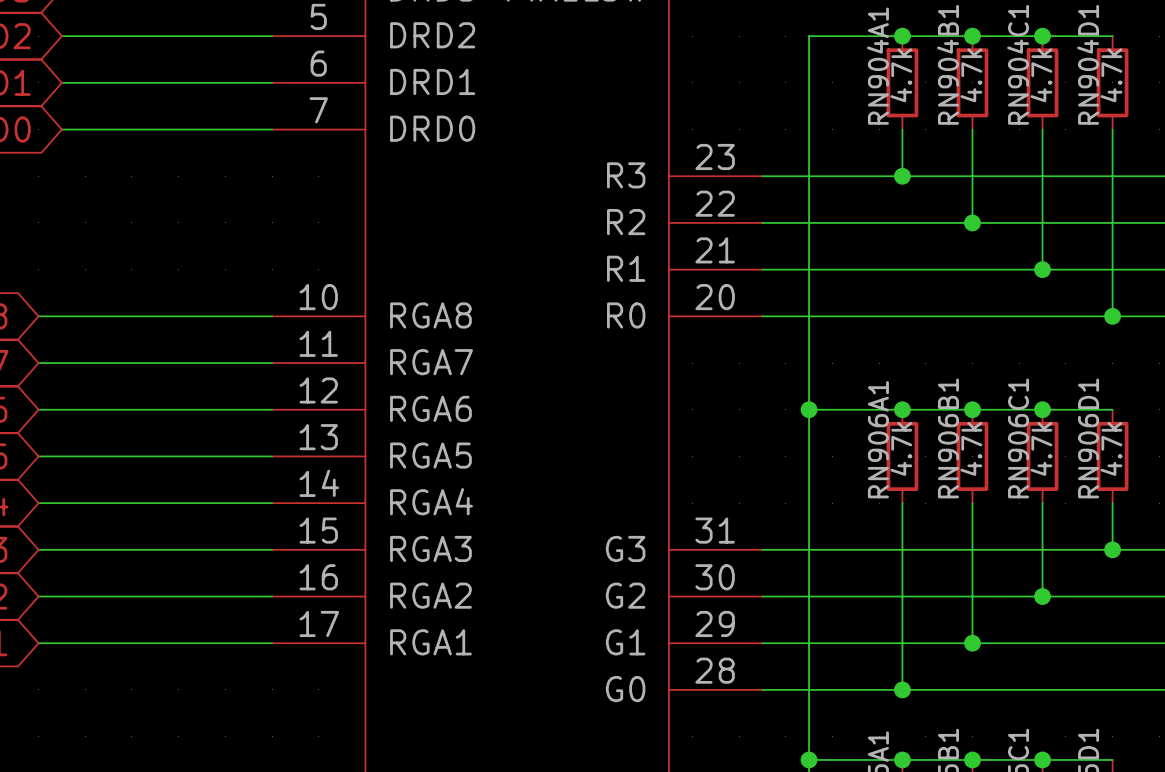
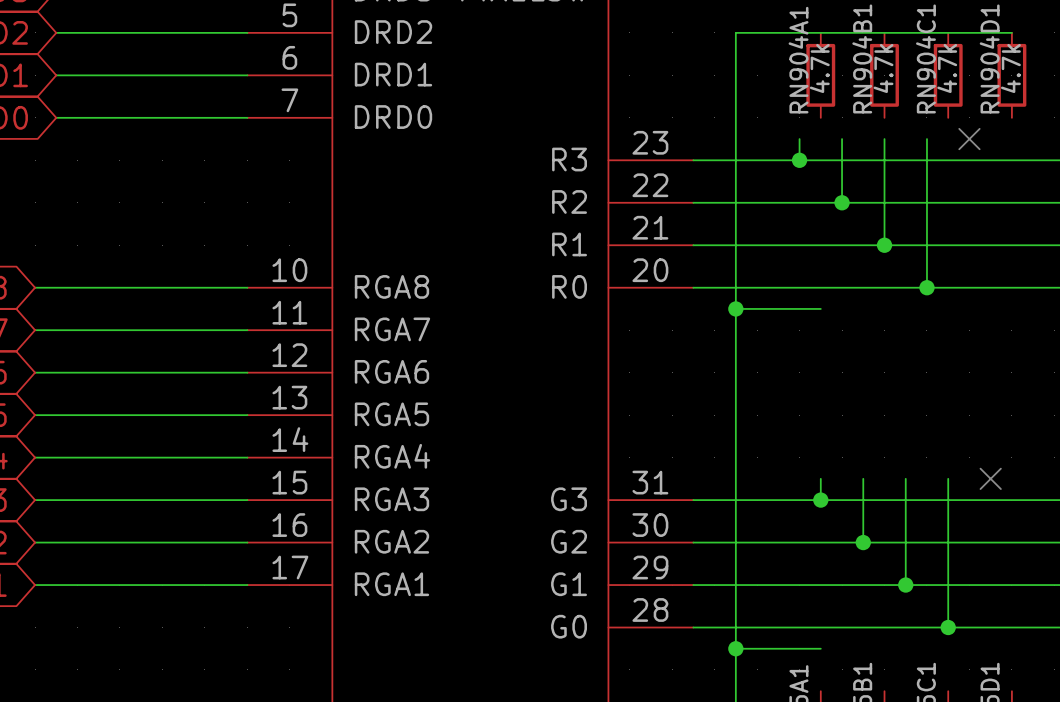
junction: (902, 36) -> none
junction: (972, 36) -> none
junction: (1042, 36) -> none
wire: (902, 129) (902, 176) -> (884, 202) (884, 245)
wire: (972, 129) (972, 152) -> (799, 139) (799, 160)
wire: (1042, 129) (1042, 269) -> none
wire: (1112, 129) (1112, 316) -> none
wire: none -> (842, 139) (842, 202)
wire: none -> (926, 139) (926, 287)
no-connect mark: none -> (969, 139)
junction position: (902, 176) -> (799, 160)
junction: none -> (842, 202)
junction: (972, 222) -> none
junction: none -> (884, 245)
junction: (1042, 269) -> none
junction: none -> (926, 287)
junction: (1112, 316) -> none
wire: none -> (735, 308) (820, 308)
junction: none -> (735, 308)
wire: (809, 409) (1112, 409) -> none
junction: (809, 409) -> none
junction: (902, 409) -> none
junction: (972, 409) -> none
junction: (1042, 409) -> none
RN906A1: 4.7k (902, 456) -> none
RN906B1: 4.7k (972, 456) -> none
RN906C1: 4.7k (1042, 456) -> none
RN906D1: 4.7k (1112, 456) -> none
wire: (902, 503) (902, 526) -> none
wire: (972, 503) (972, 643) -> none
wire: (1042, 503) (1042, 526) -> none
wire: (1112, 503) (1112, 549) -> none
wire: none -> (863, 478) (863, 542)
wire: none -> (905, 478) (905, 585)
no-connect mark: none -> (990, 478)
wire: (902, 549) (902, 689) -> none
junction: none -> (820, 500)
junction: (1112, 549) -> none
junction: none -> (863, 542)
wire: none -> (948, 542) (948, 627)
junction: (1042, 596) -> none
junction position: (972, 643) -> (905, 585)
junction: (902, 689) -> none
junction: none -> (948, 627)
wire: none -> (735, 648) (820, 648)
wire: (809, 759) (1112, 759) -> none
junction position: (809, 759) -> (735, 648)
junction: (902, 759) -> none
junction: (972, 759) -> none
junction: (1042, 759) -> none

